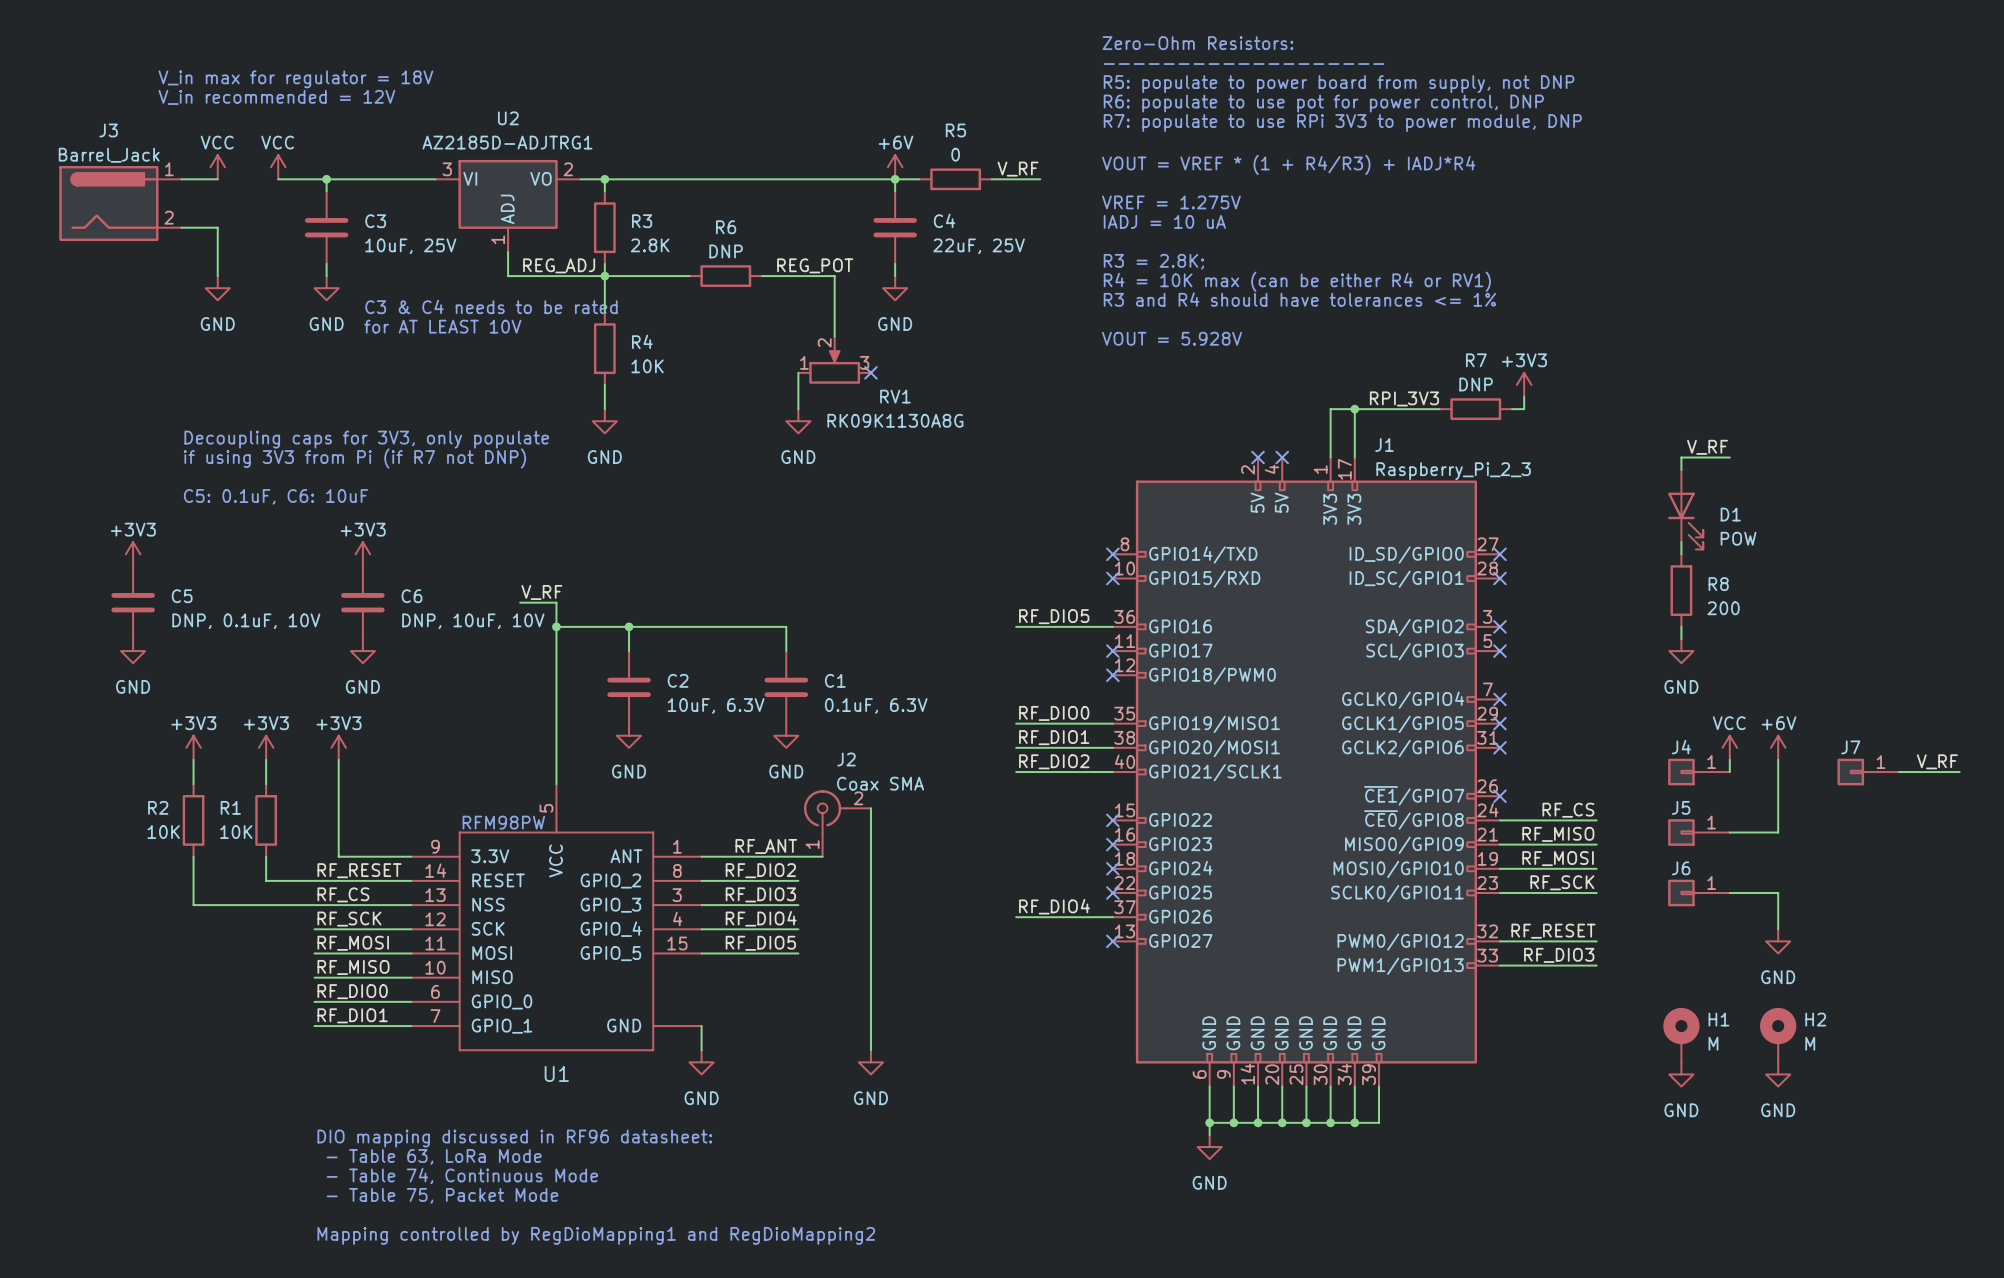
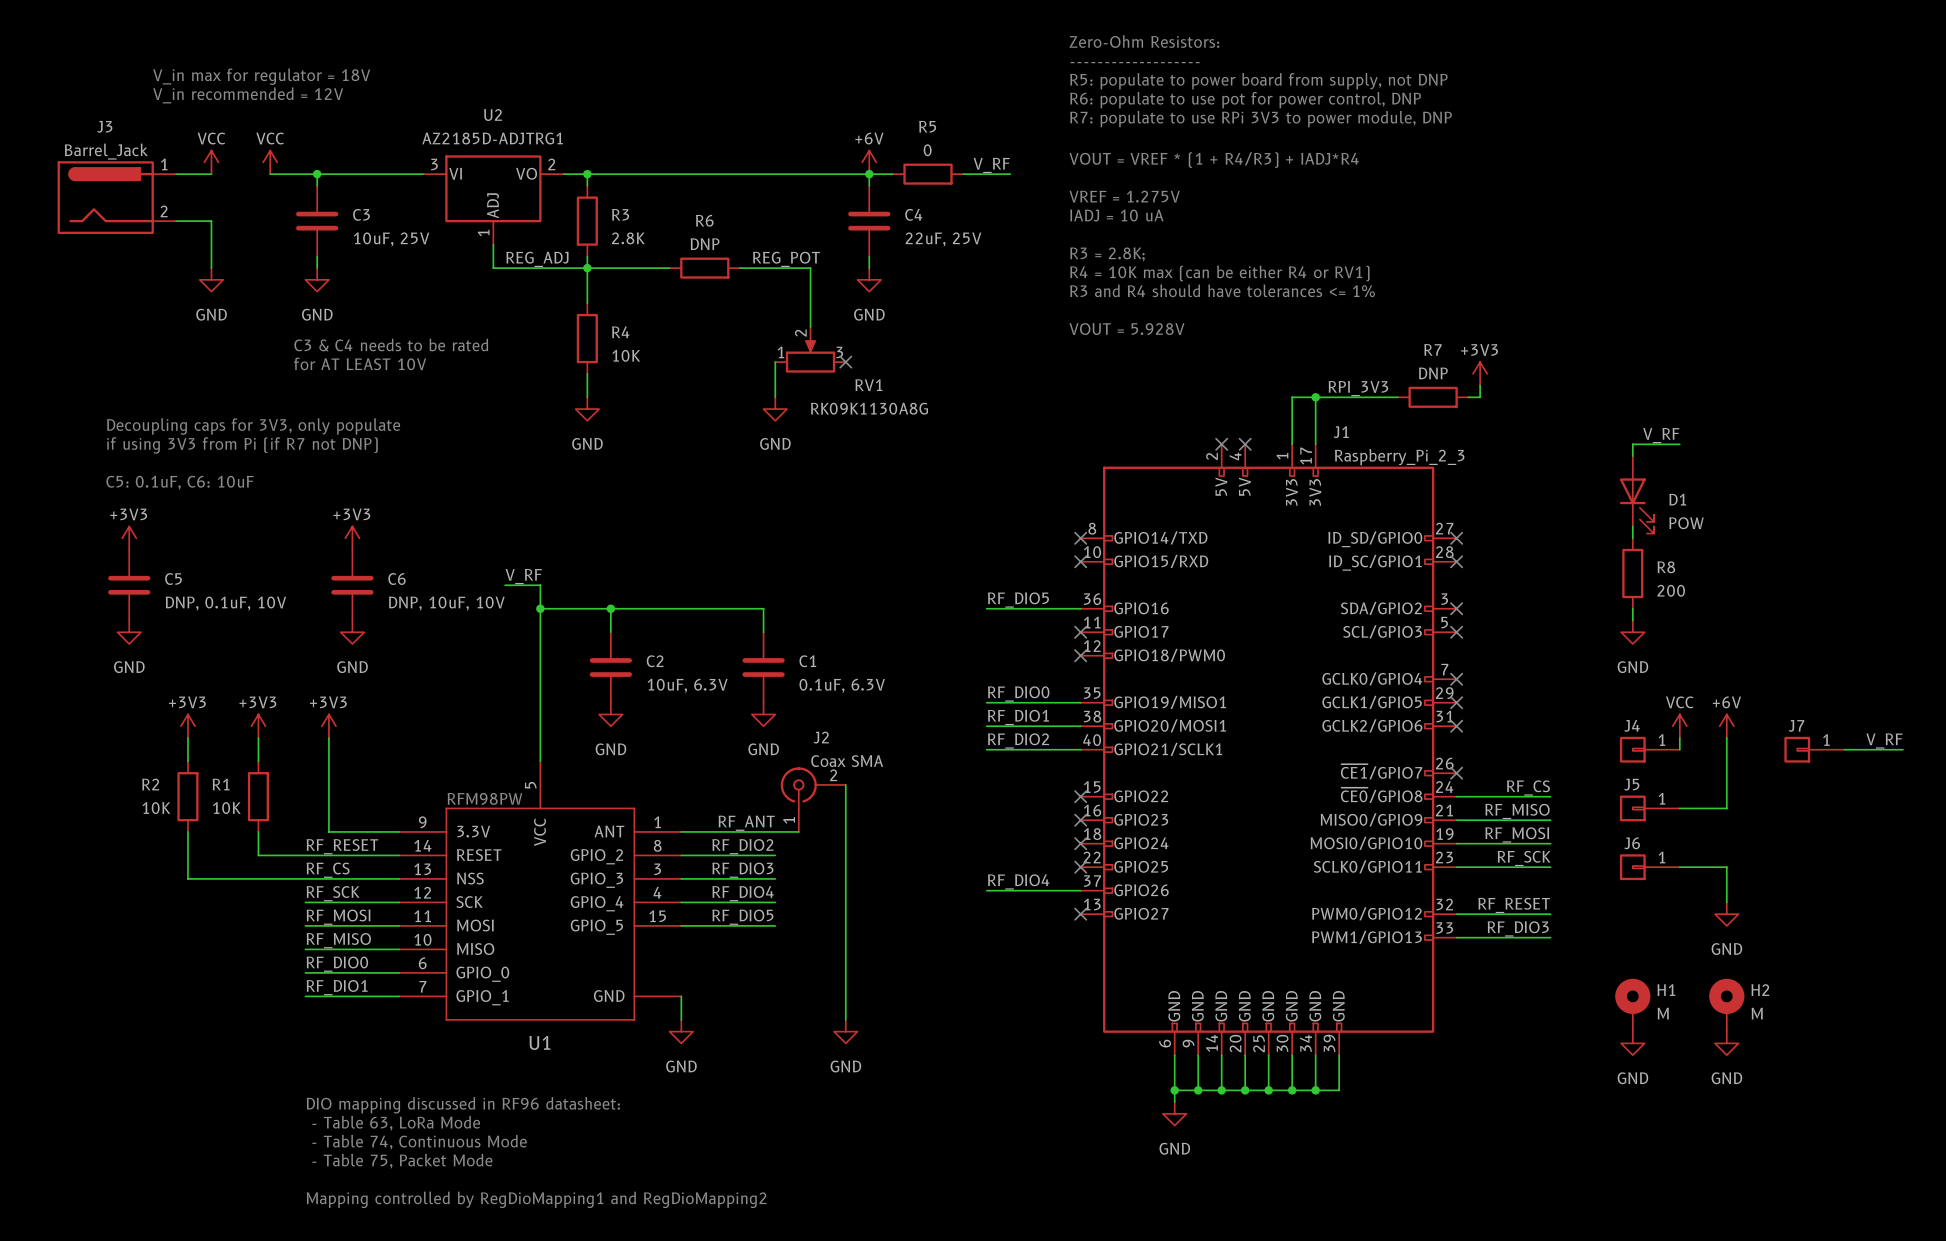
text position: C3 & C4 needs to be rated (491, 306) -> C3 & C4 needs to be rated (391, 344)
text position: for AT LEAST 10V (442, 326) -> for AT LEAST 10V (360, 363)
text position: Decoupling caps for 3V3, only populate (366, 439) -> Decoupling caps for 3V3, only populate (253, 426)
text position: if using 3V3 from Pi (if R7 not DNP) (354, 458) -> if using 3V3 from Pi (if R7 not DNP) (242, 445)
text position: C5: 0.1uF, C6: 10uF (276, 496) -> C5: 0.1uF, C6: 10uF (180, 482)

